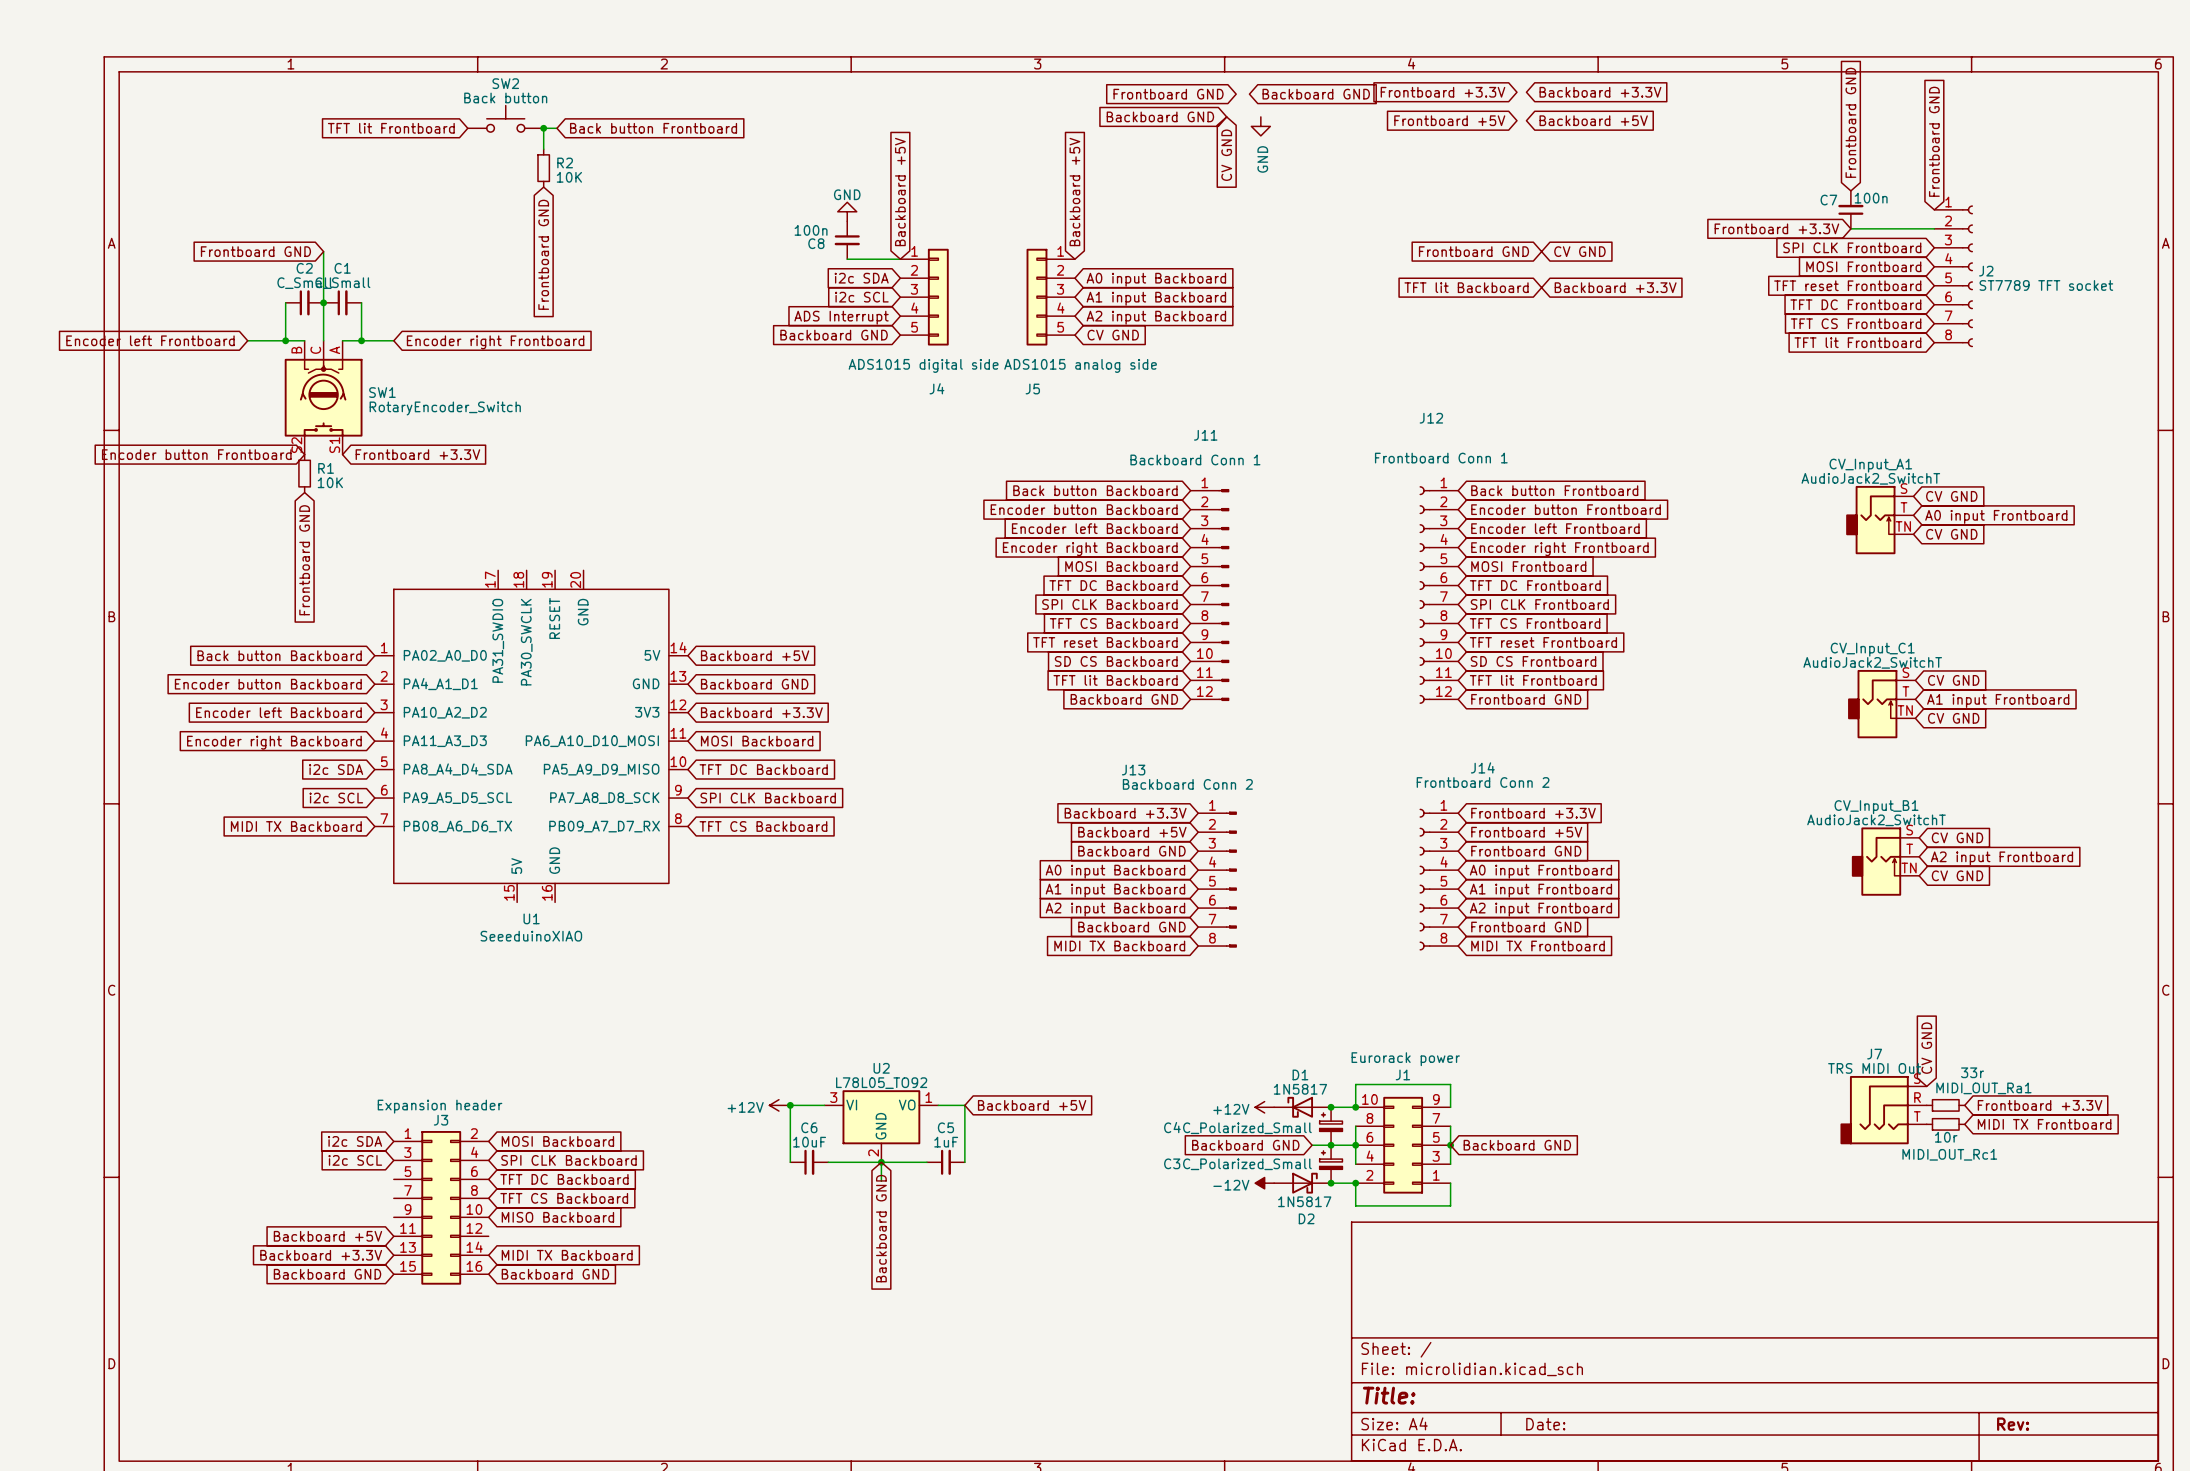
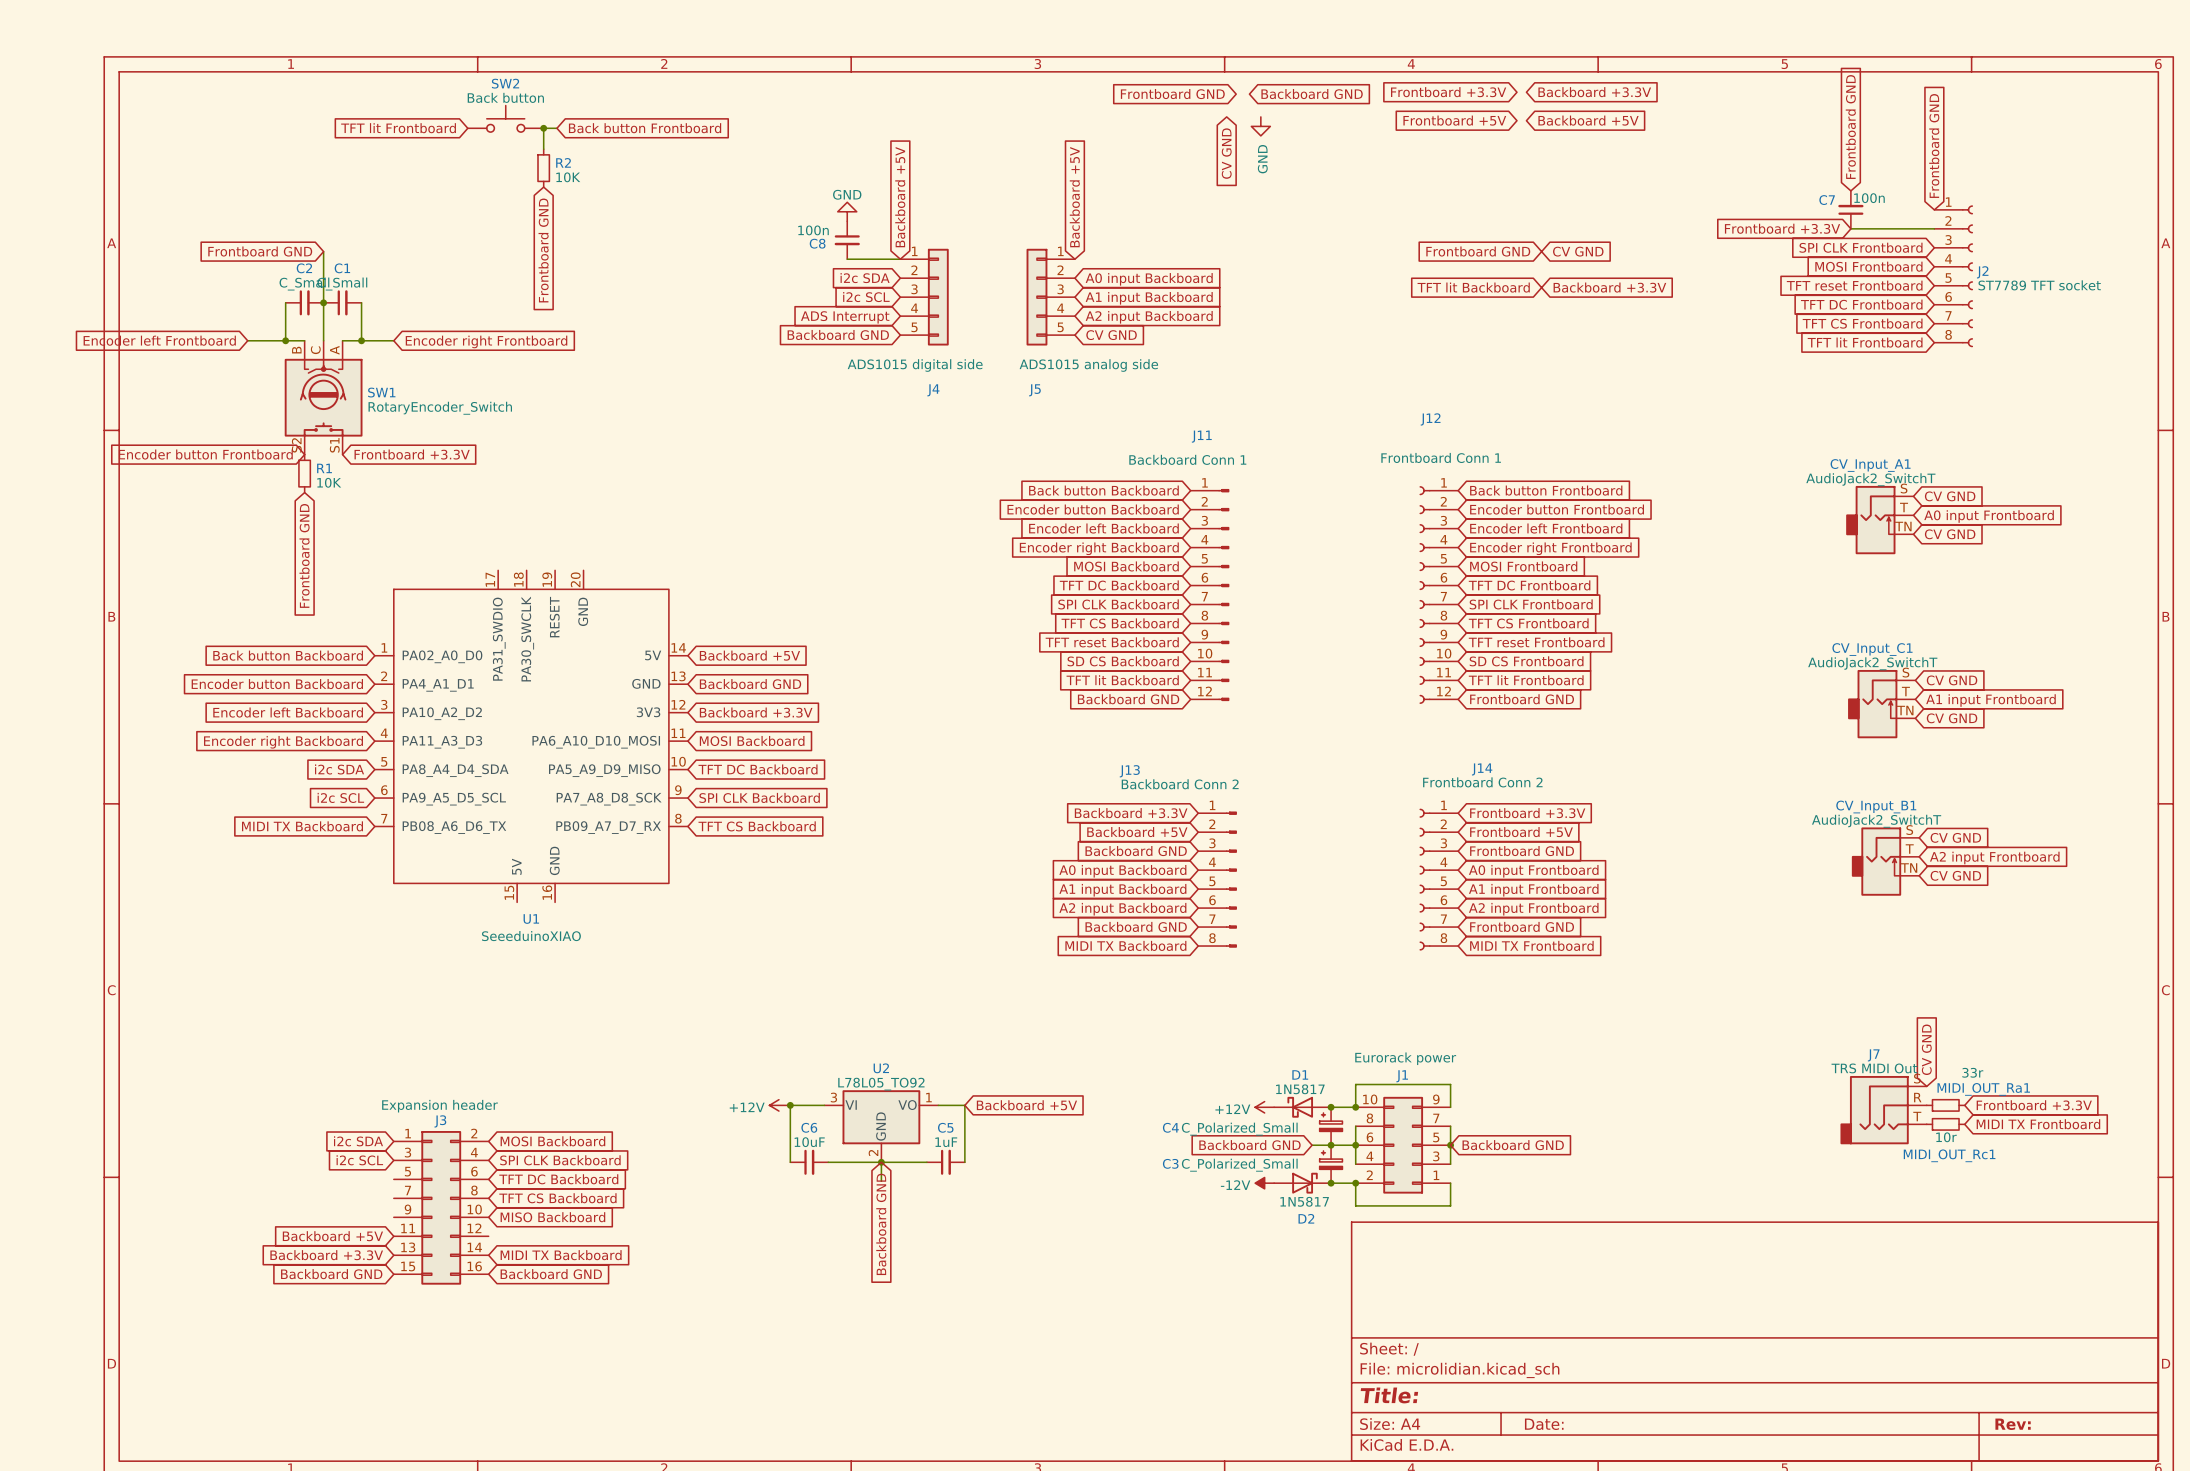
global label: Backboard GND (1160, 116) -> none

